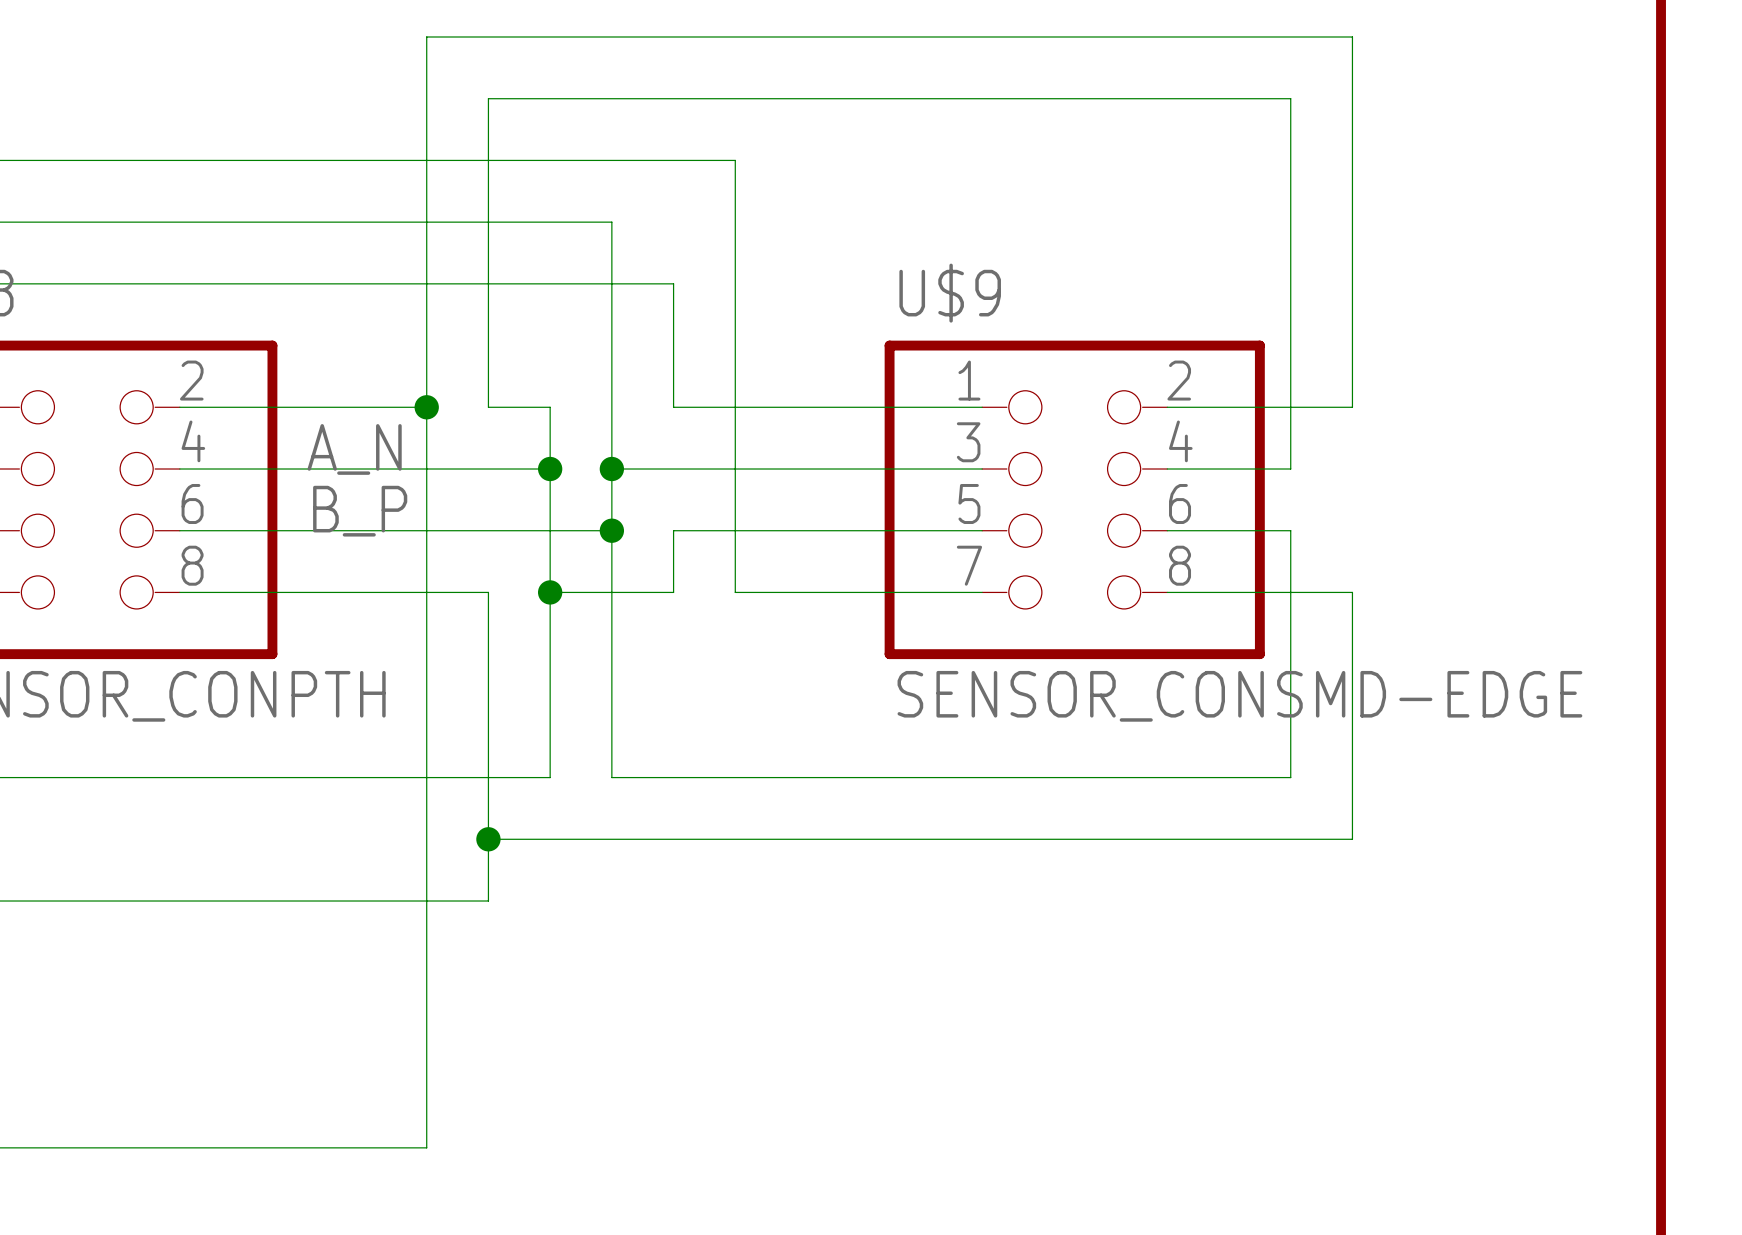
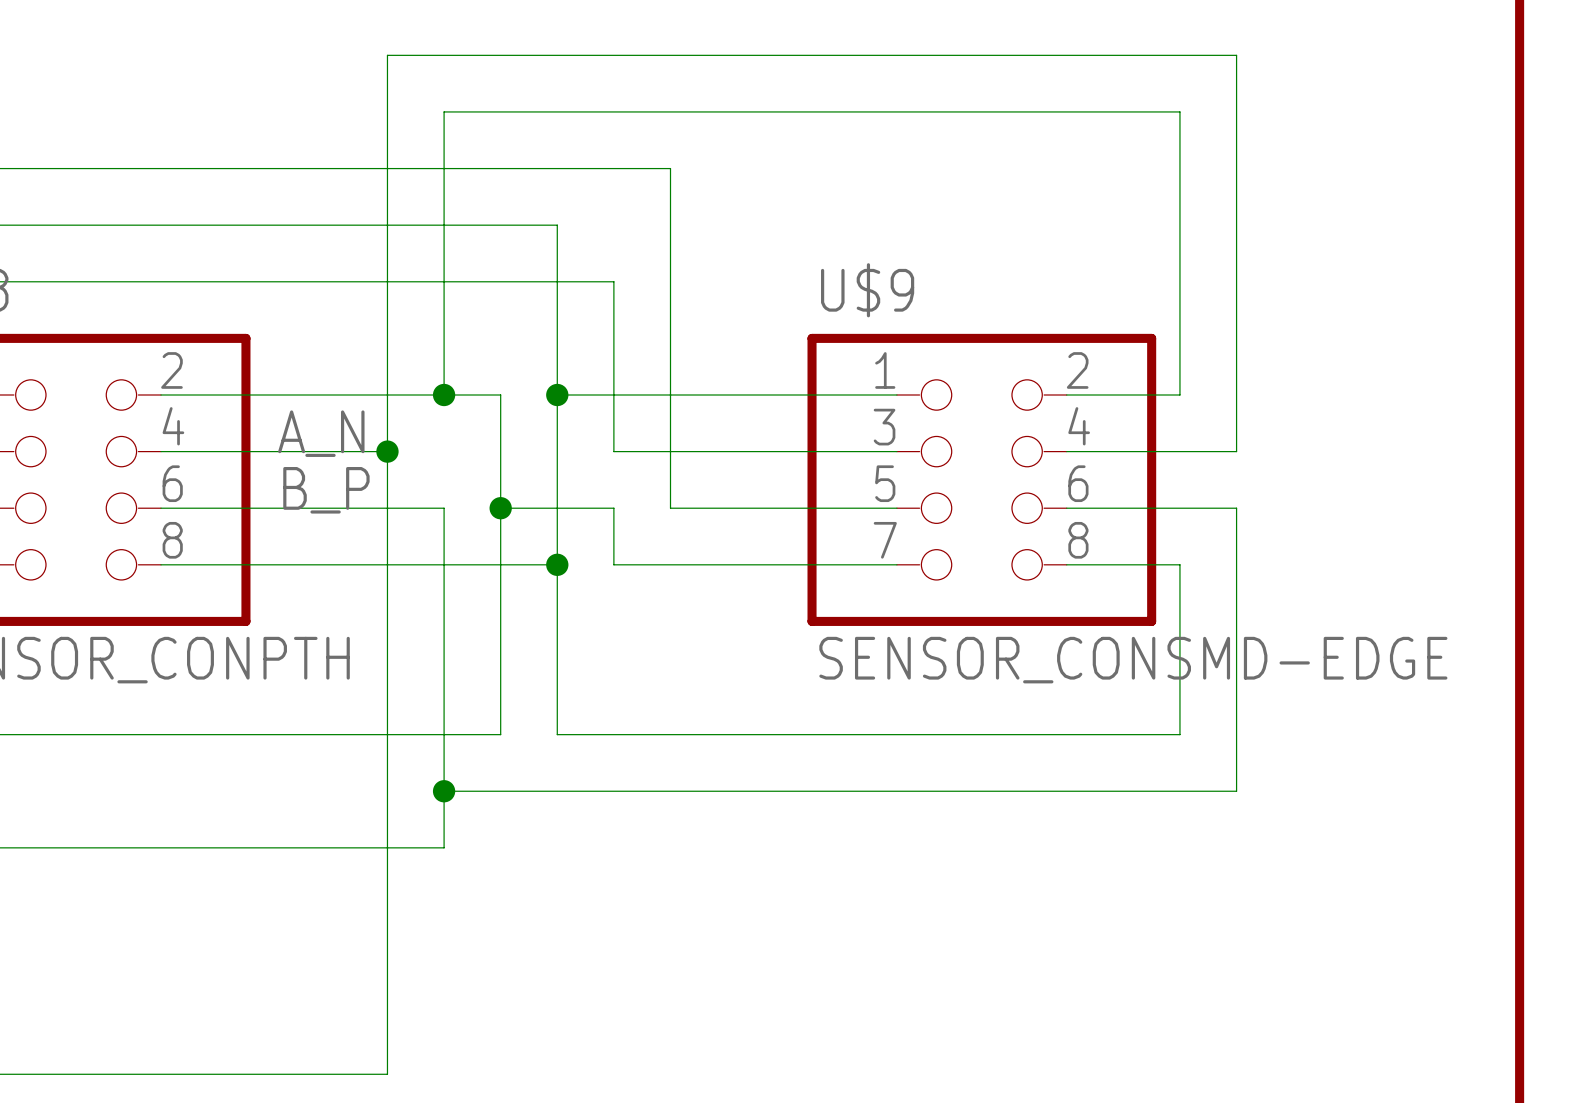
wire: none -> (387, 394) (444, 394)
junction: (426, 407) -> none
junction: none -> (444, 394)
junction: none -> (557, 394)
wire: (1352, 407) (1290, 407) (1290, 469) -> (1236, 394) (1236, 451) (1179, 451)
wire: (426, 469) (550, 469) -> none
junction: none -> (387, 451)
junction: (550, 469) -> none
wire: (611, 469) (673, 469) -> (557, 394) (613, 394) (613, 451)
junction: (611, 469) -> none
wire: (488, 530) (550, 530) -> (444, 508) (444, 564) (500, 564)
junction: none -> (500, 508)
junction: (611, 530) -> none
wire: (673, 530) (735, 530) (735, 592) -> (613, 564) (670, 564)
wire: (1290, 530) (1290, 592) (1352, 592) -> (1179, 508) (1236, 508) (1236, 564)
junction: (550, 592) -> none
wire: (611, 592) (673, 592) -> (557, 508) (613, 508)
junction: none -> (557, 564)

